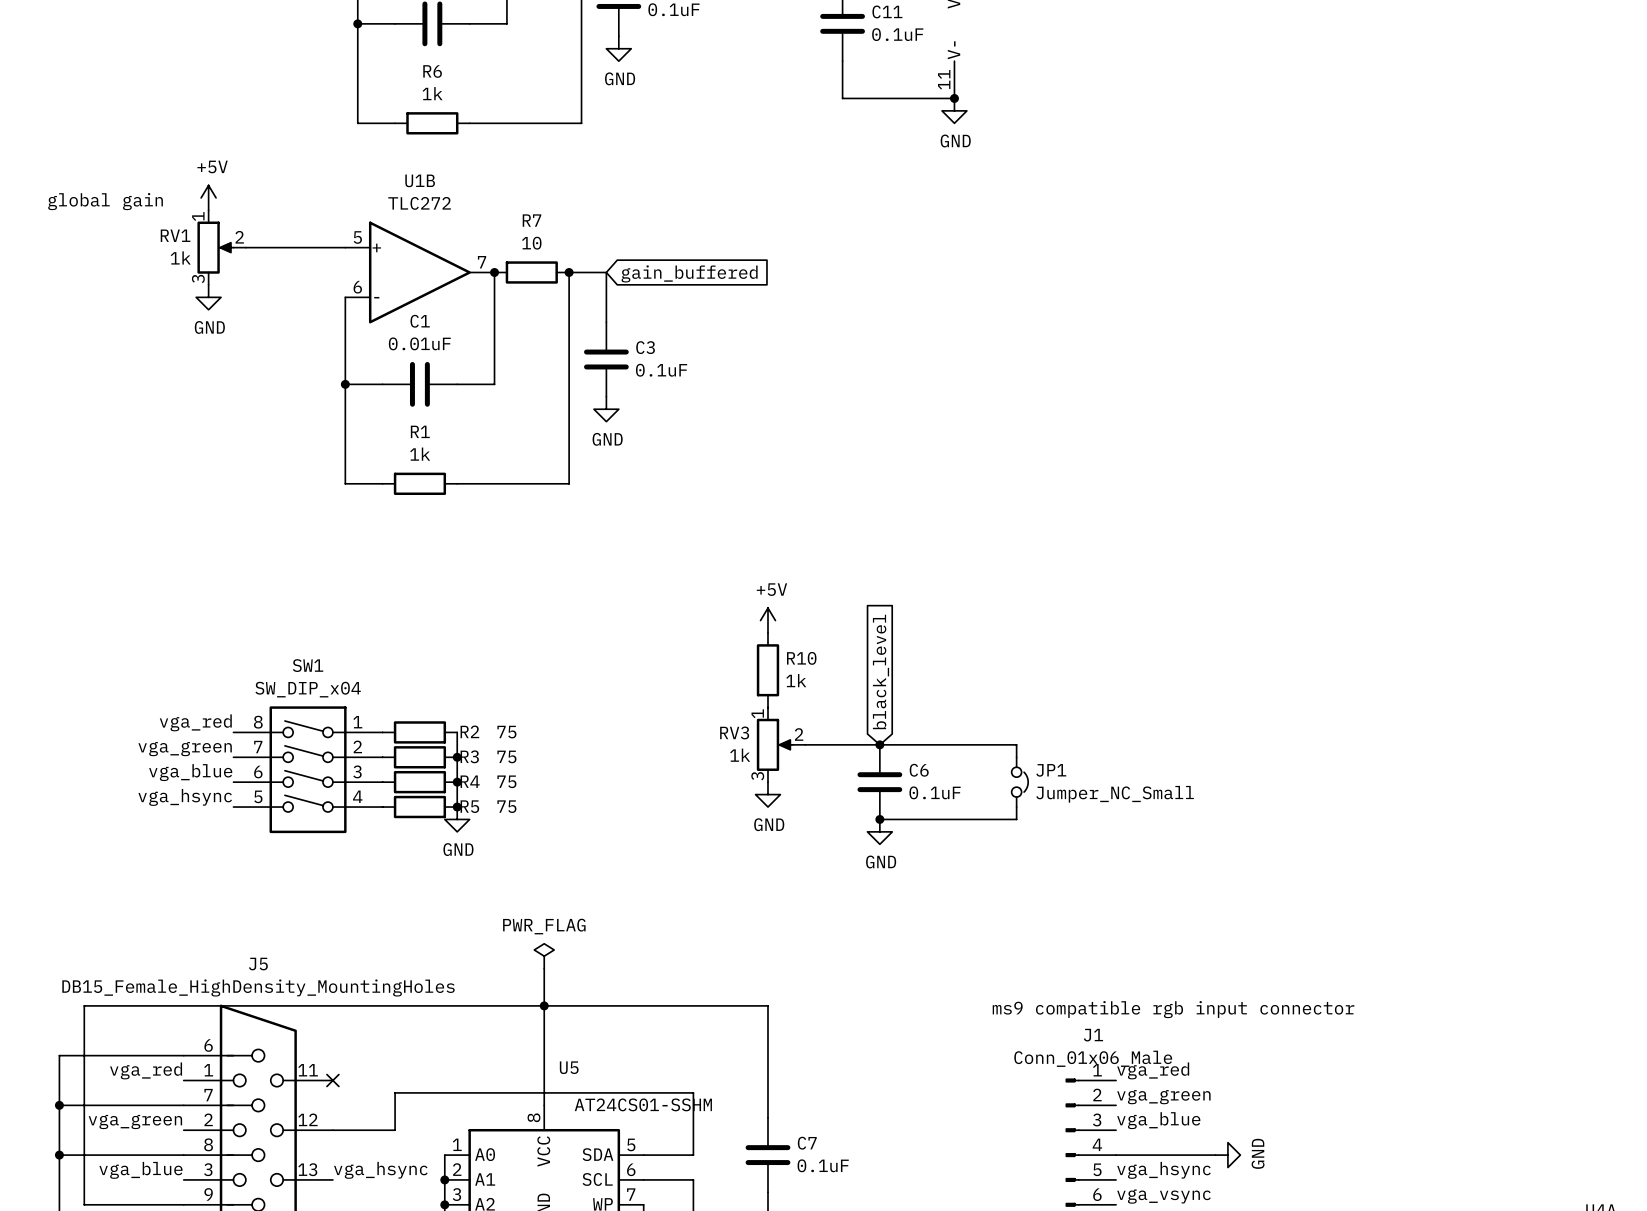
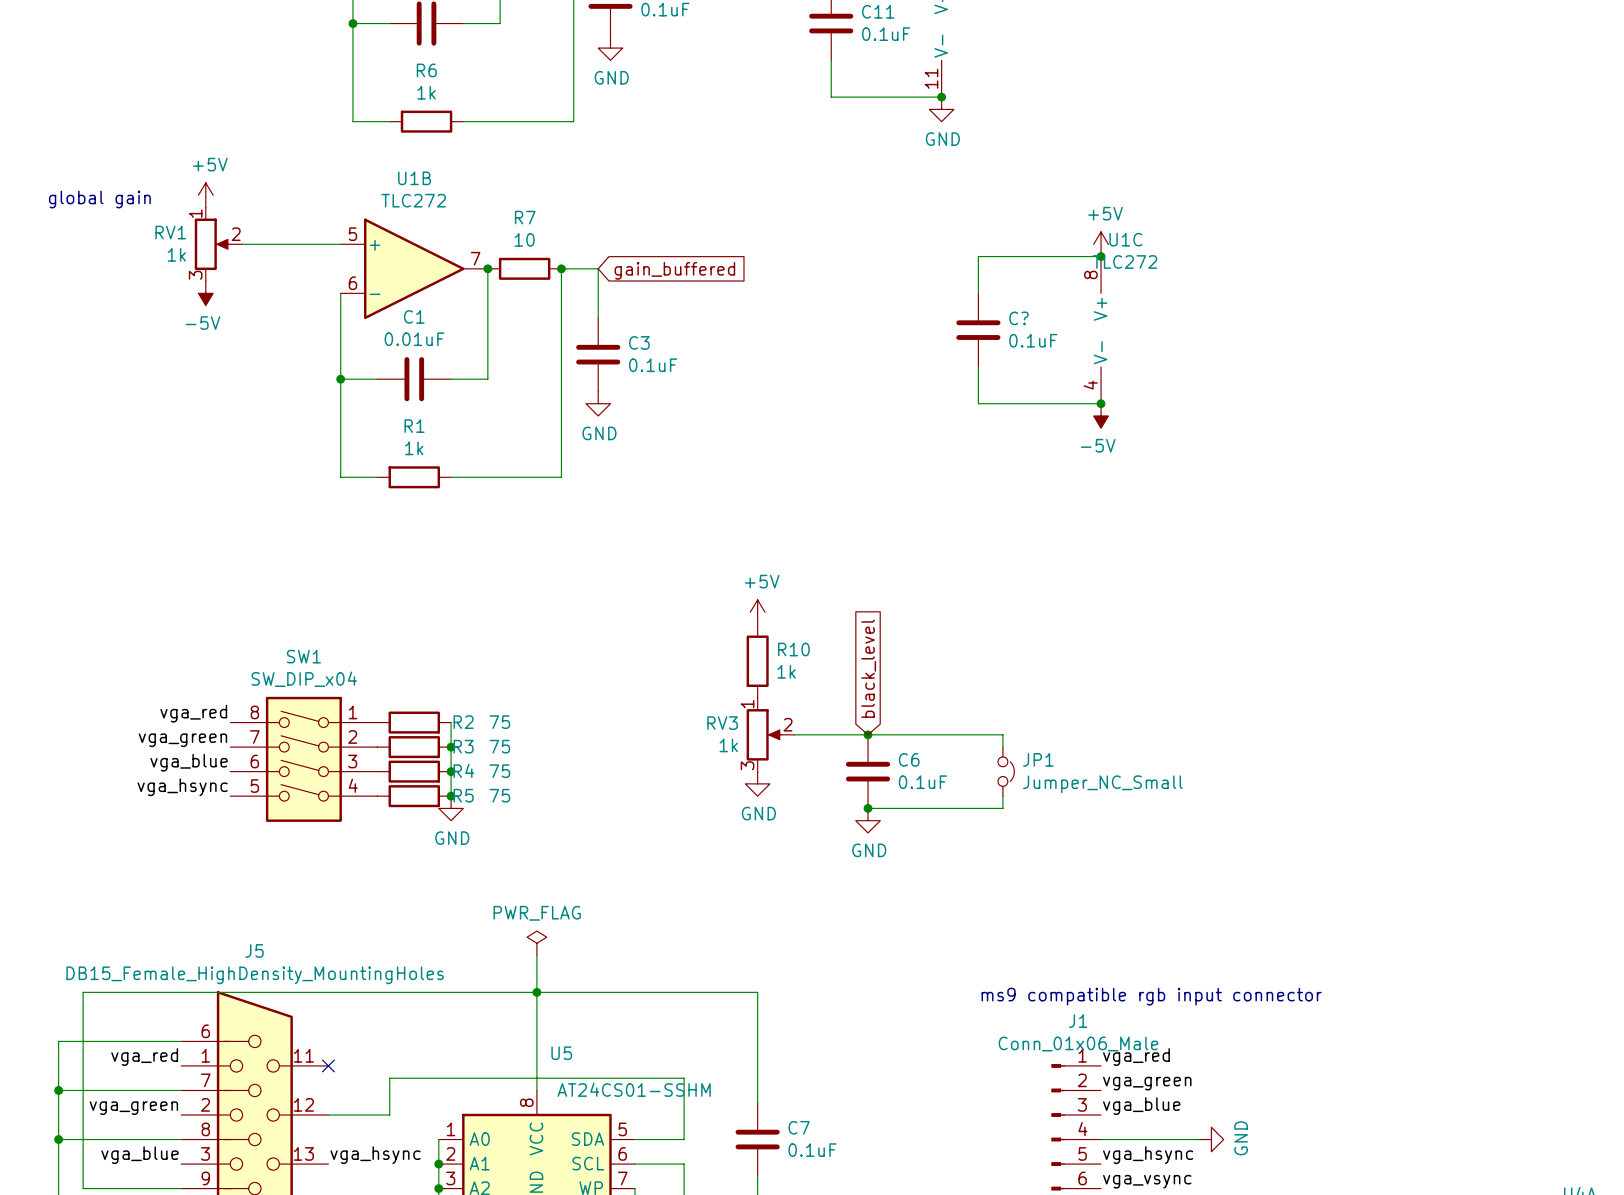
power symbol: none -> +5V (1101, 244)
wire: none -> (1101, 256) (978, 256) (978, 293)
junction: none -> (1101, 256)
power symbol: GND (208, 297) -> -5V (205, 293)
C?: none -> 0.1uF (978, 330)
U1C: none -> TLC272 (1101, 330)
wire: none -> (978, 366) (978, 403) (1101, 403)
junction: none -> (1101, 403)
power symbol: none -> -5V (1101, 415)

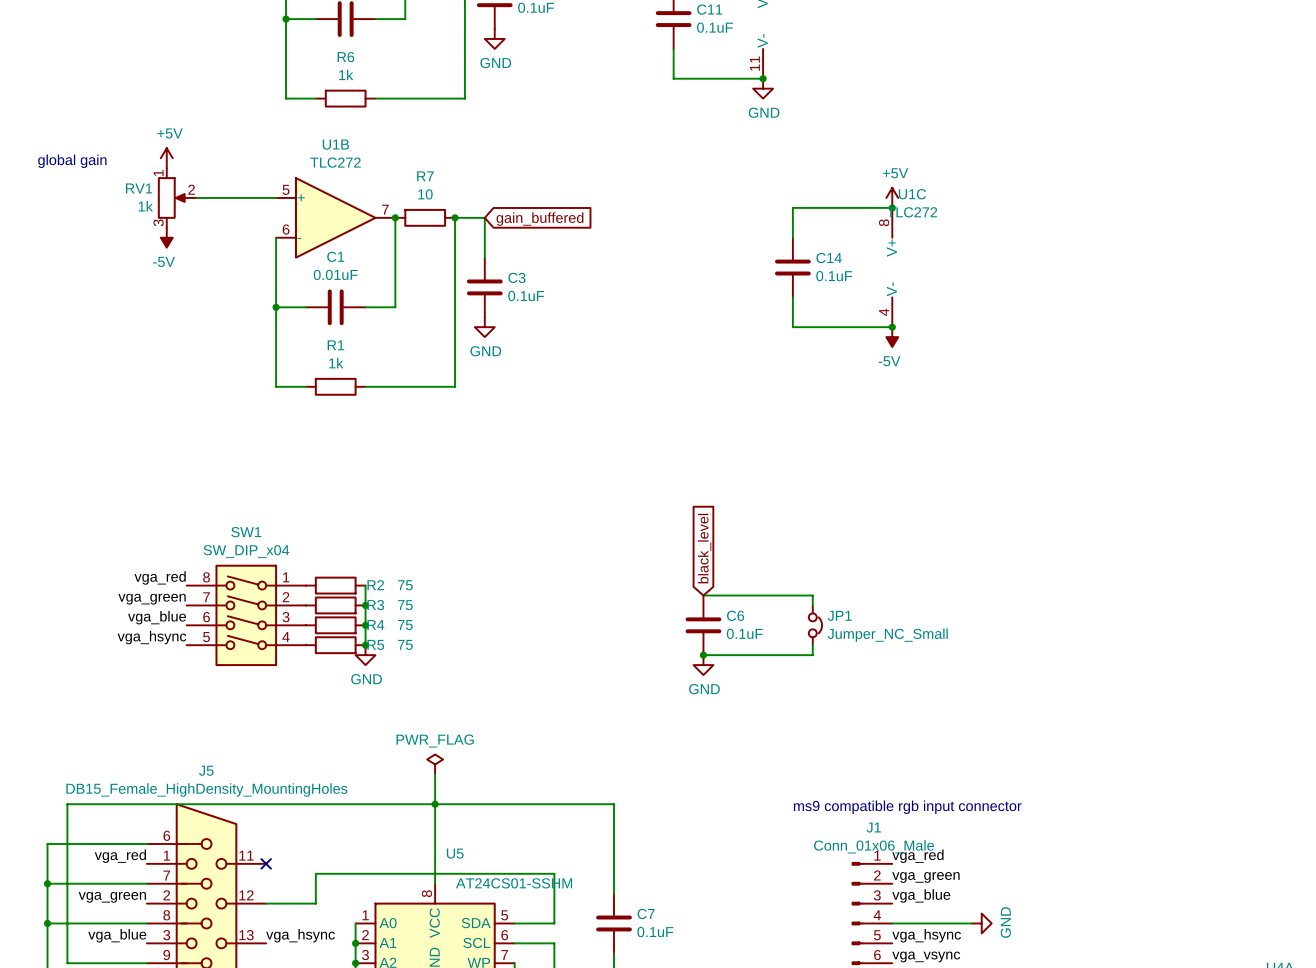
C? name: C? (1018, 318) -> C14 (829, 258)
power symbol: +5V (757, 612) -> none
R10: 1k (757, 661) -> none
RV3: 1k (770, 734) -> none
wire: (794, 734) (868, 734) -> none
junction: (868, 734) -> none
power symbol: GND (757, 783) -> none

